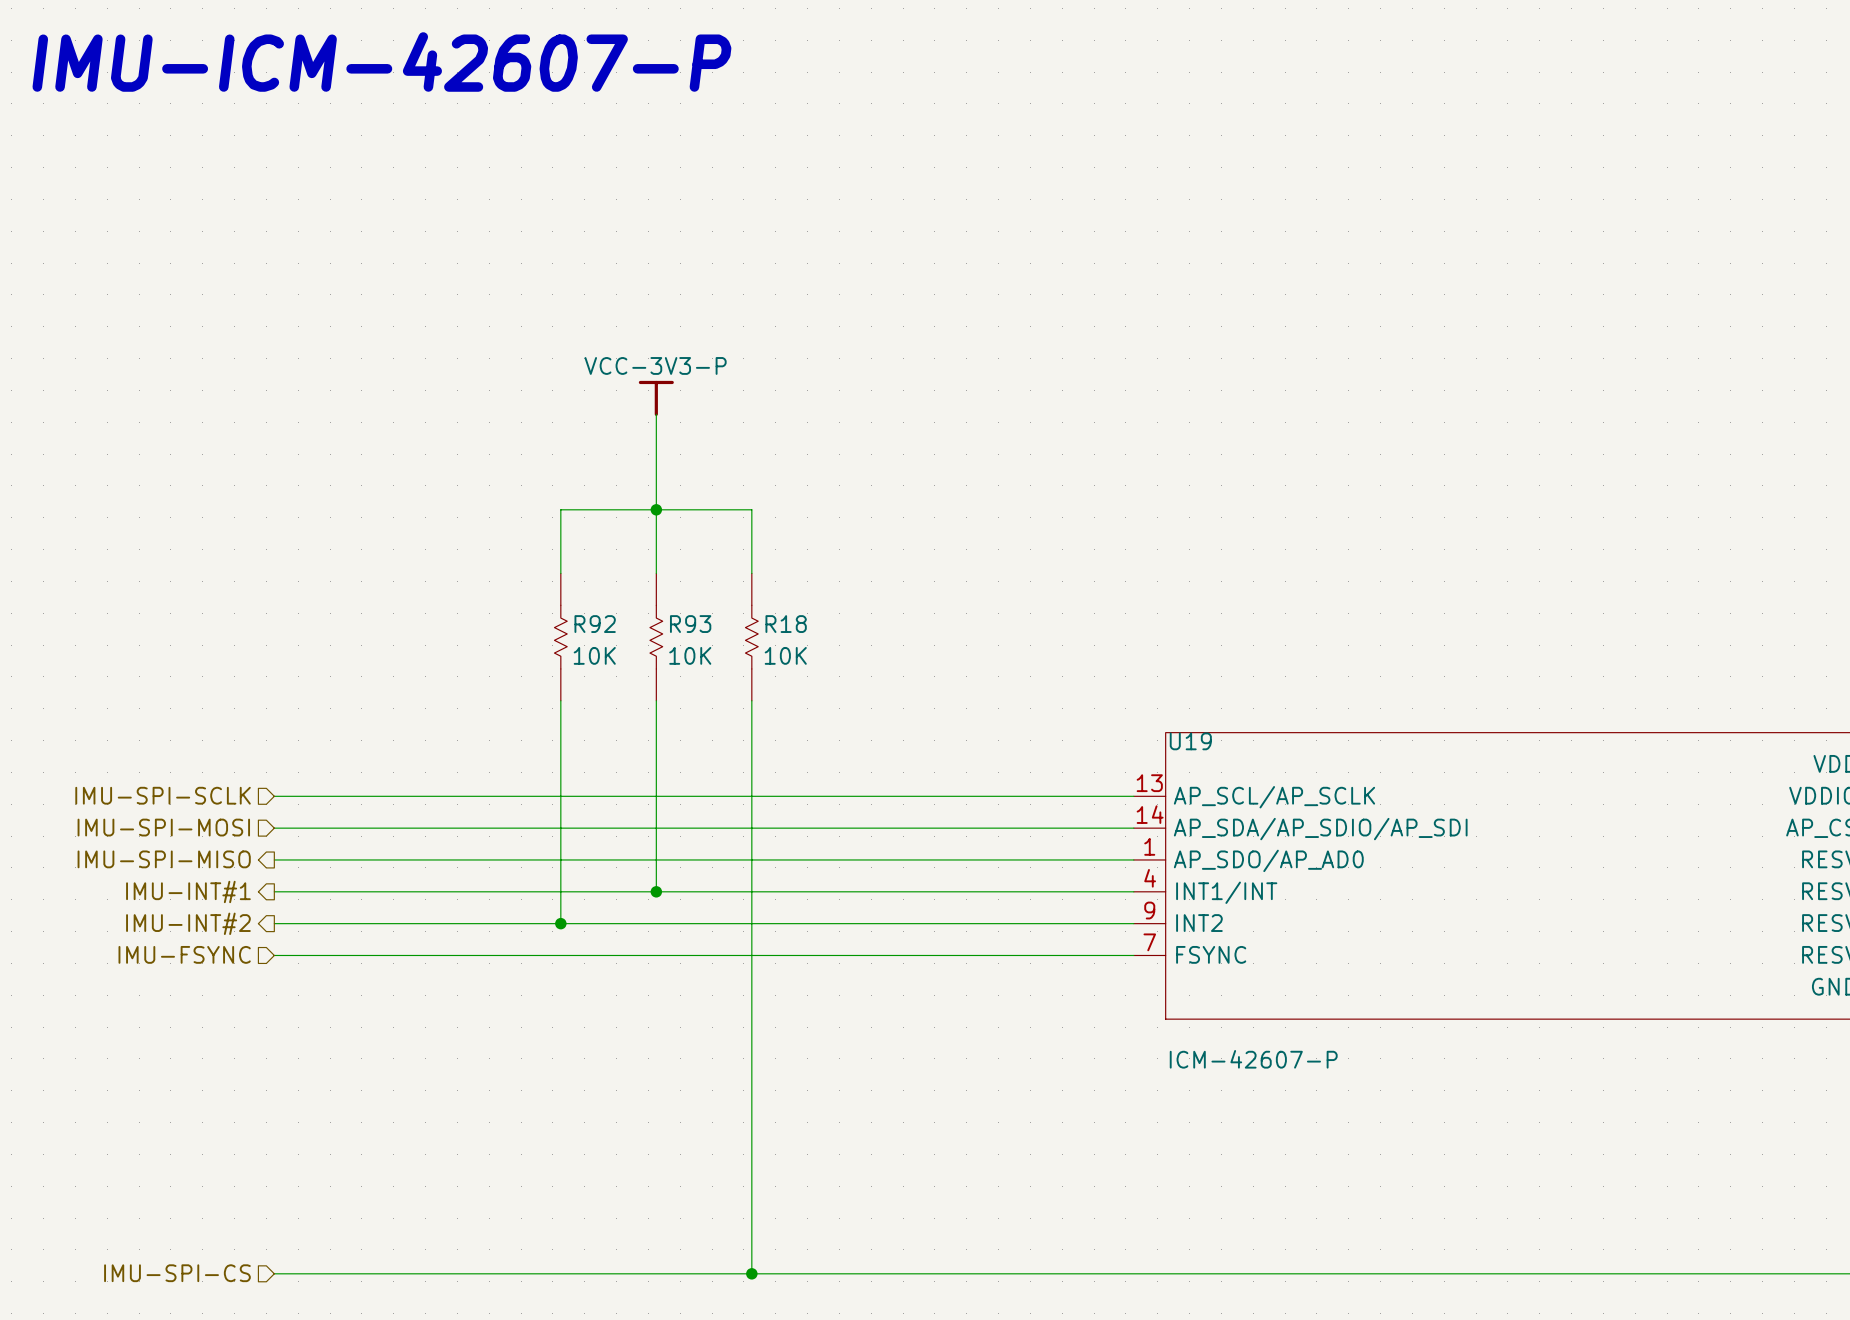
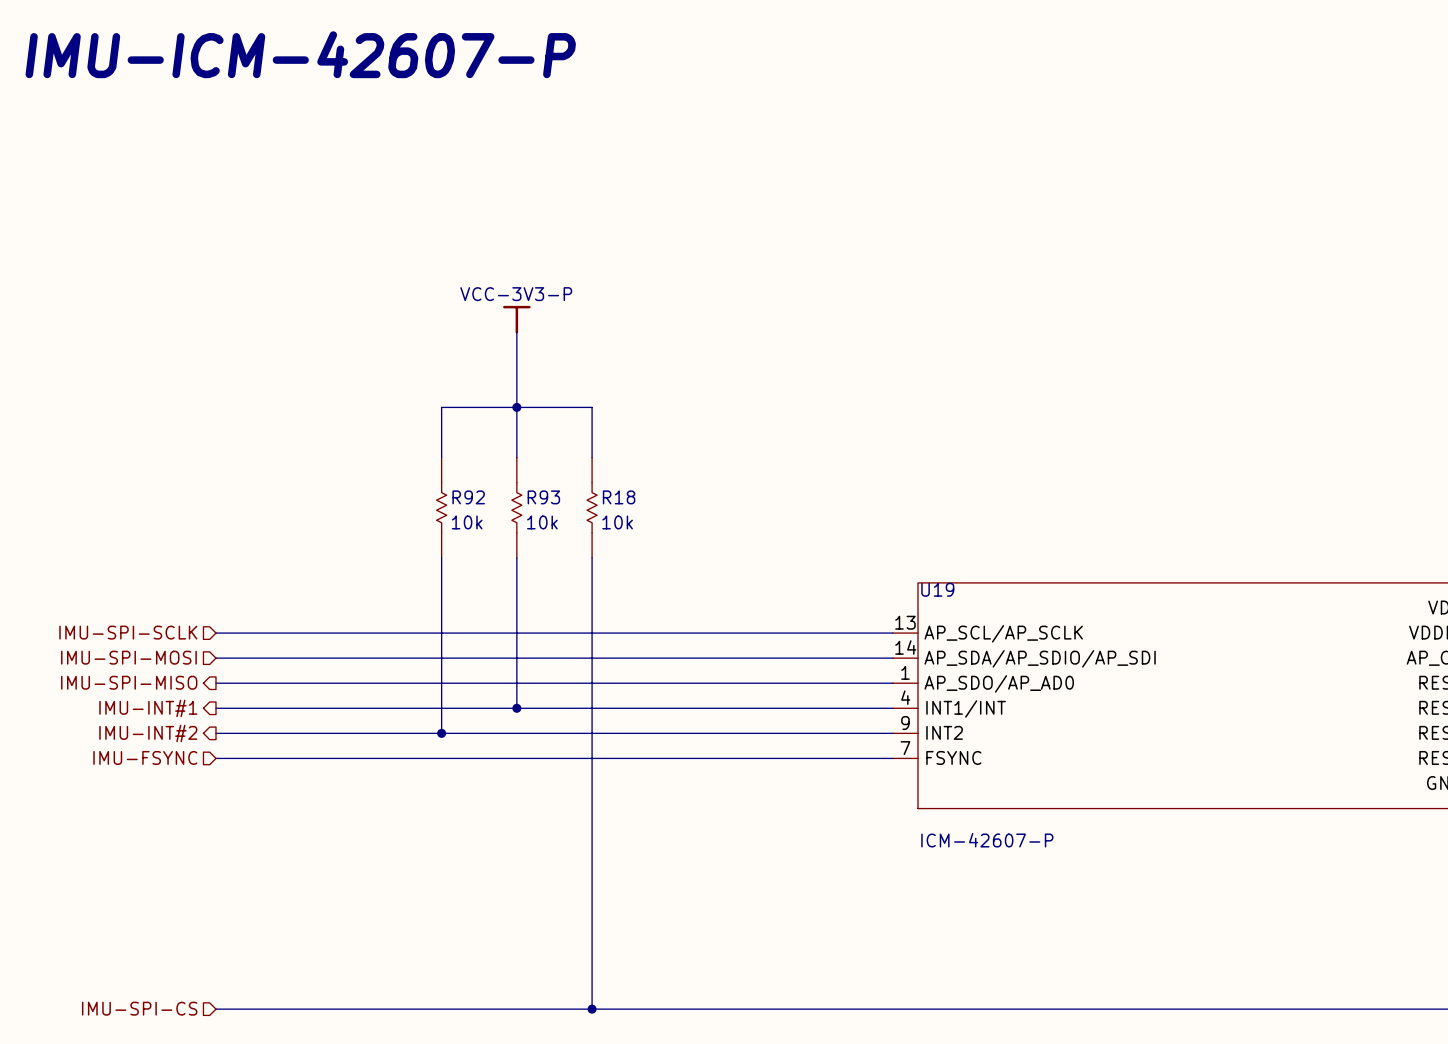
R92 value: 10K (594, 655) -> 10k (467, 522)
R93 value: 10K (690, 655) -> 10k (542, 522)
R18 value: 10K (785, 655) -> 10k (617, 522)

